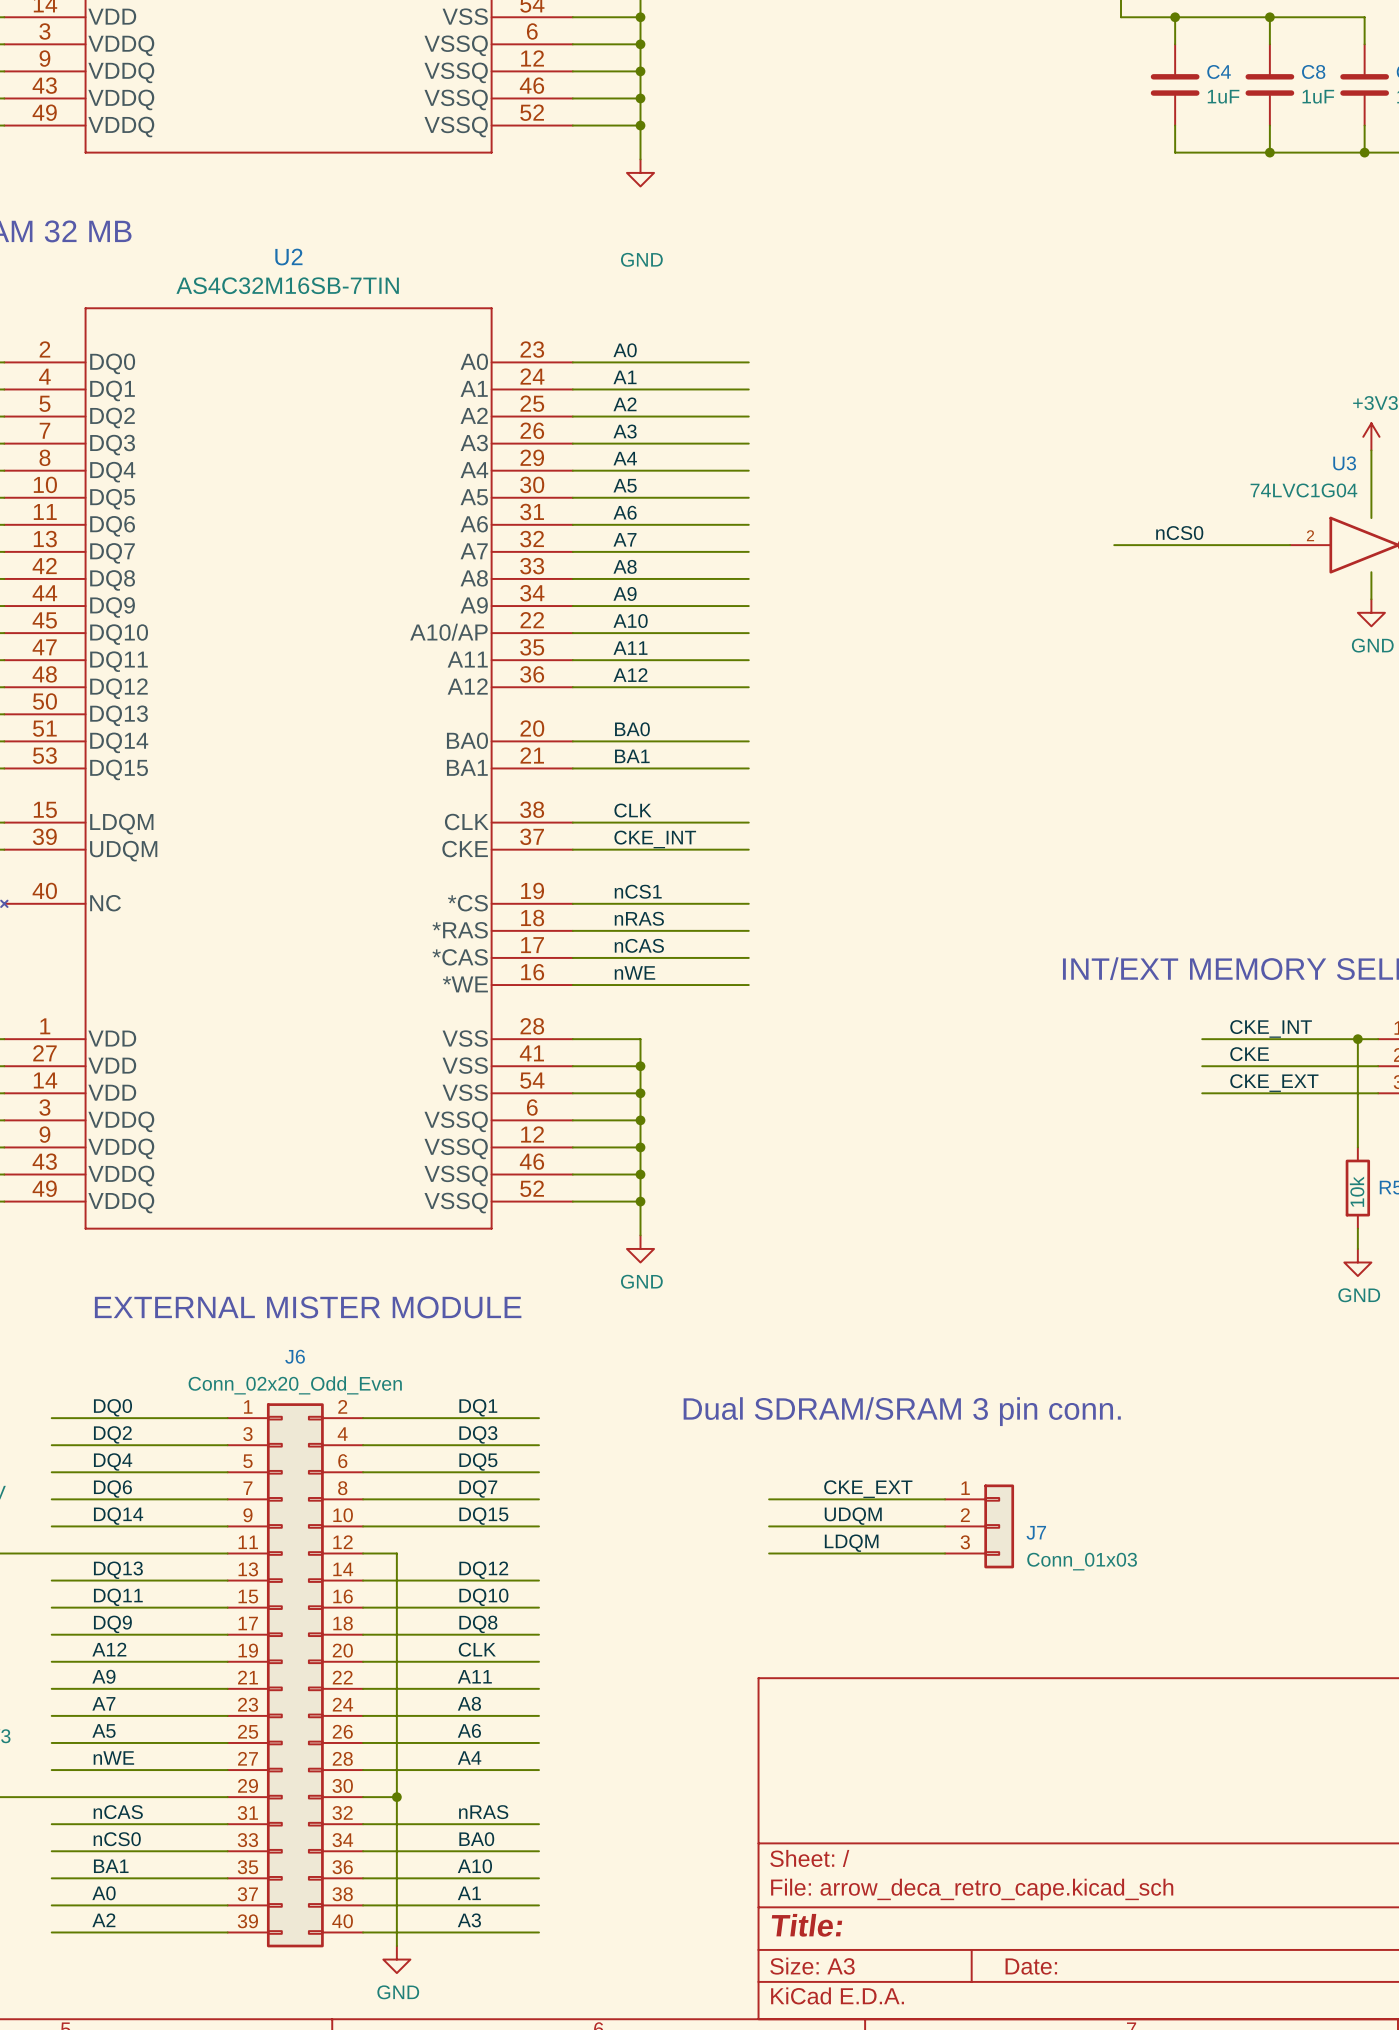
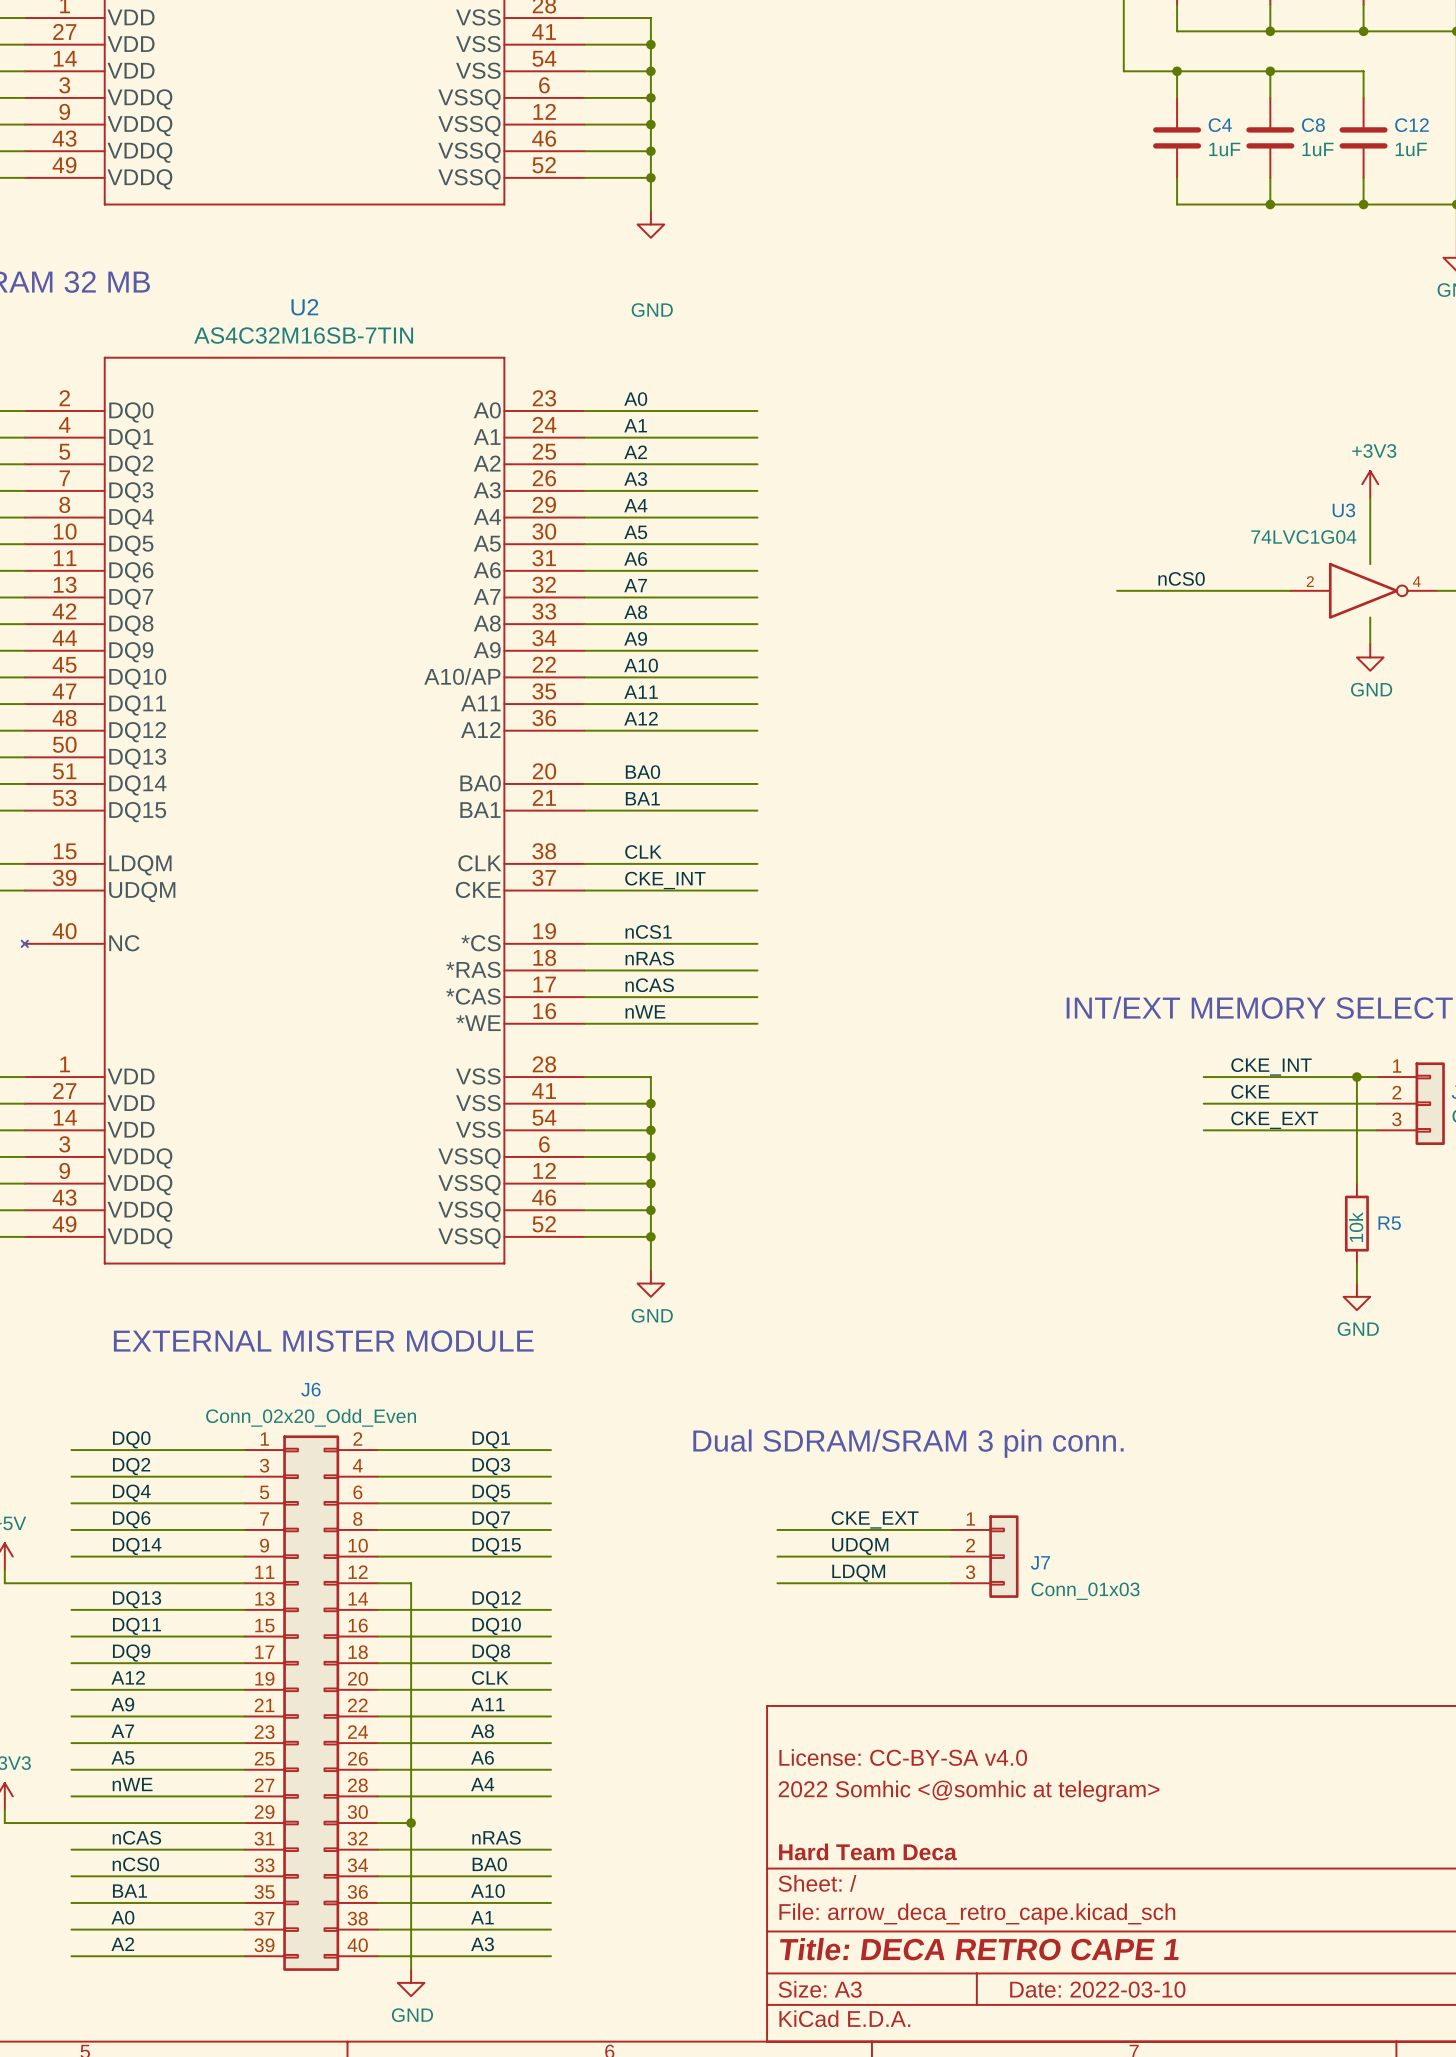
title block: none -> License: CC-BY-SA v4.0 (903, 1757)
title block: none -> 2022 Somhic <@somhic at telegram> (969, 1791)
title block: none -> Hard Team Deca (868, 1851)
title block: Title: (806, 1925) -> Title: DECA RETRO CAPE 1 (979, 1949)
title block: Date: (1031, 1966) -> Date: 2022-03-10 (1097, 1989)

